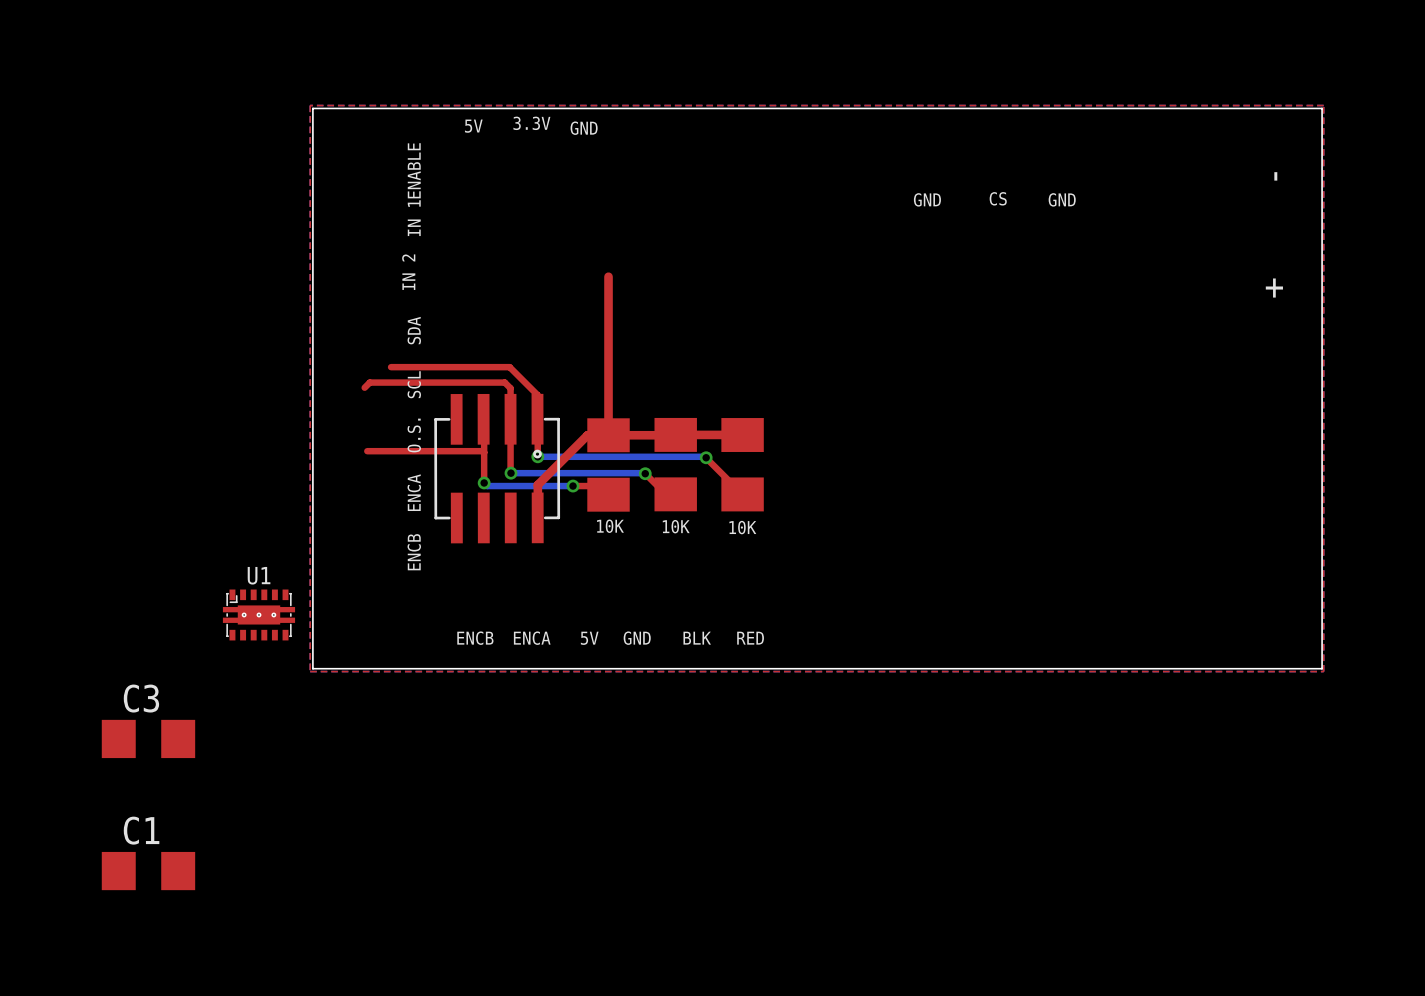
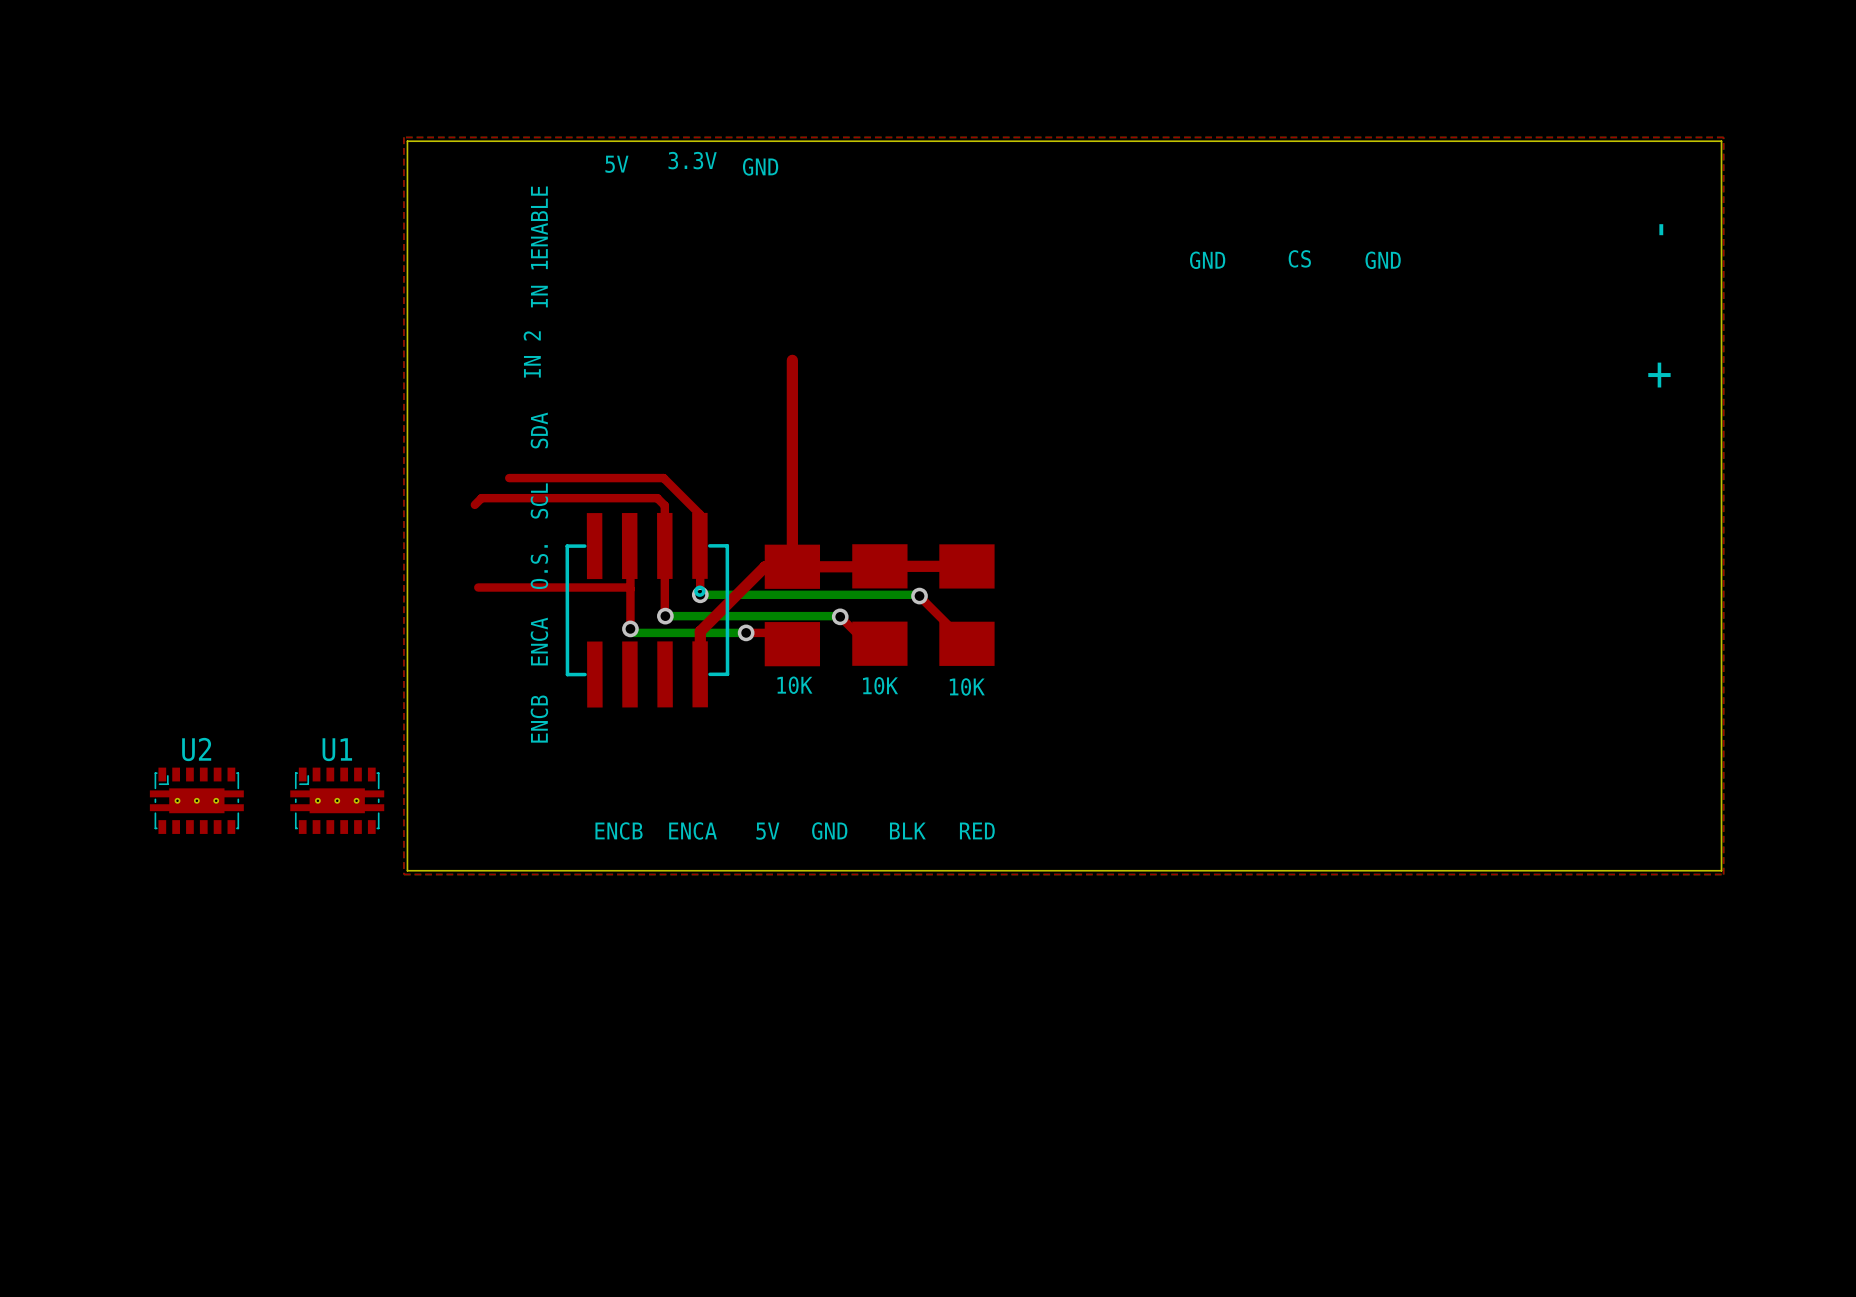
U2: none -> (196, 800)
C3: (148, 738) -> none
C1: (148, 871) -> none

